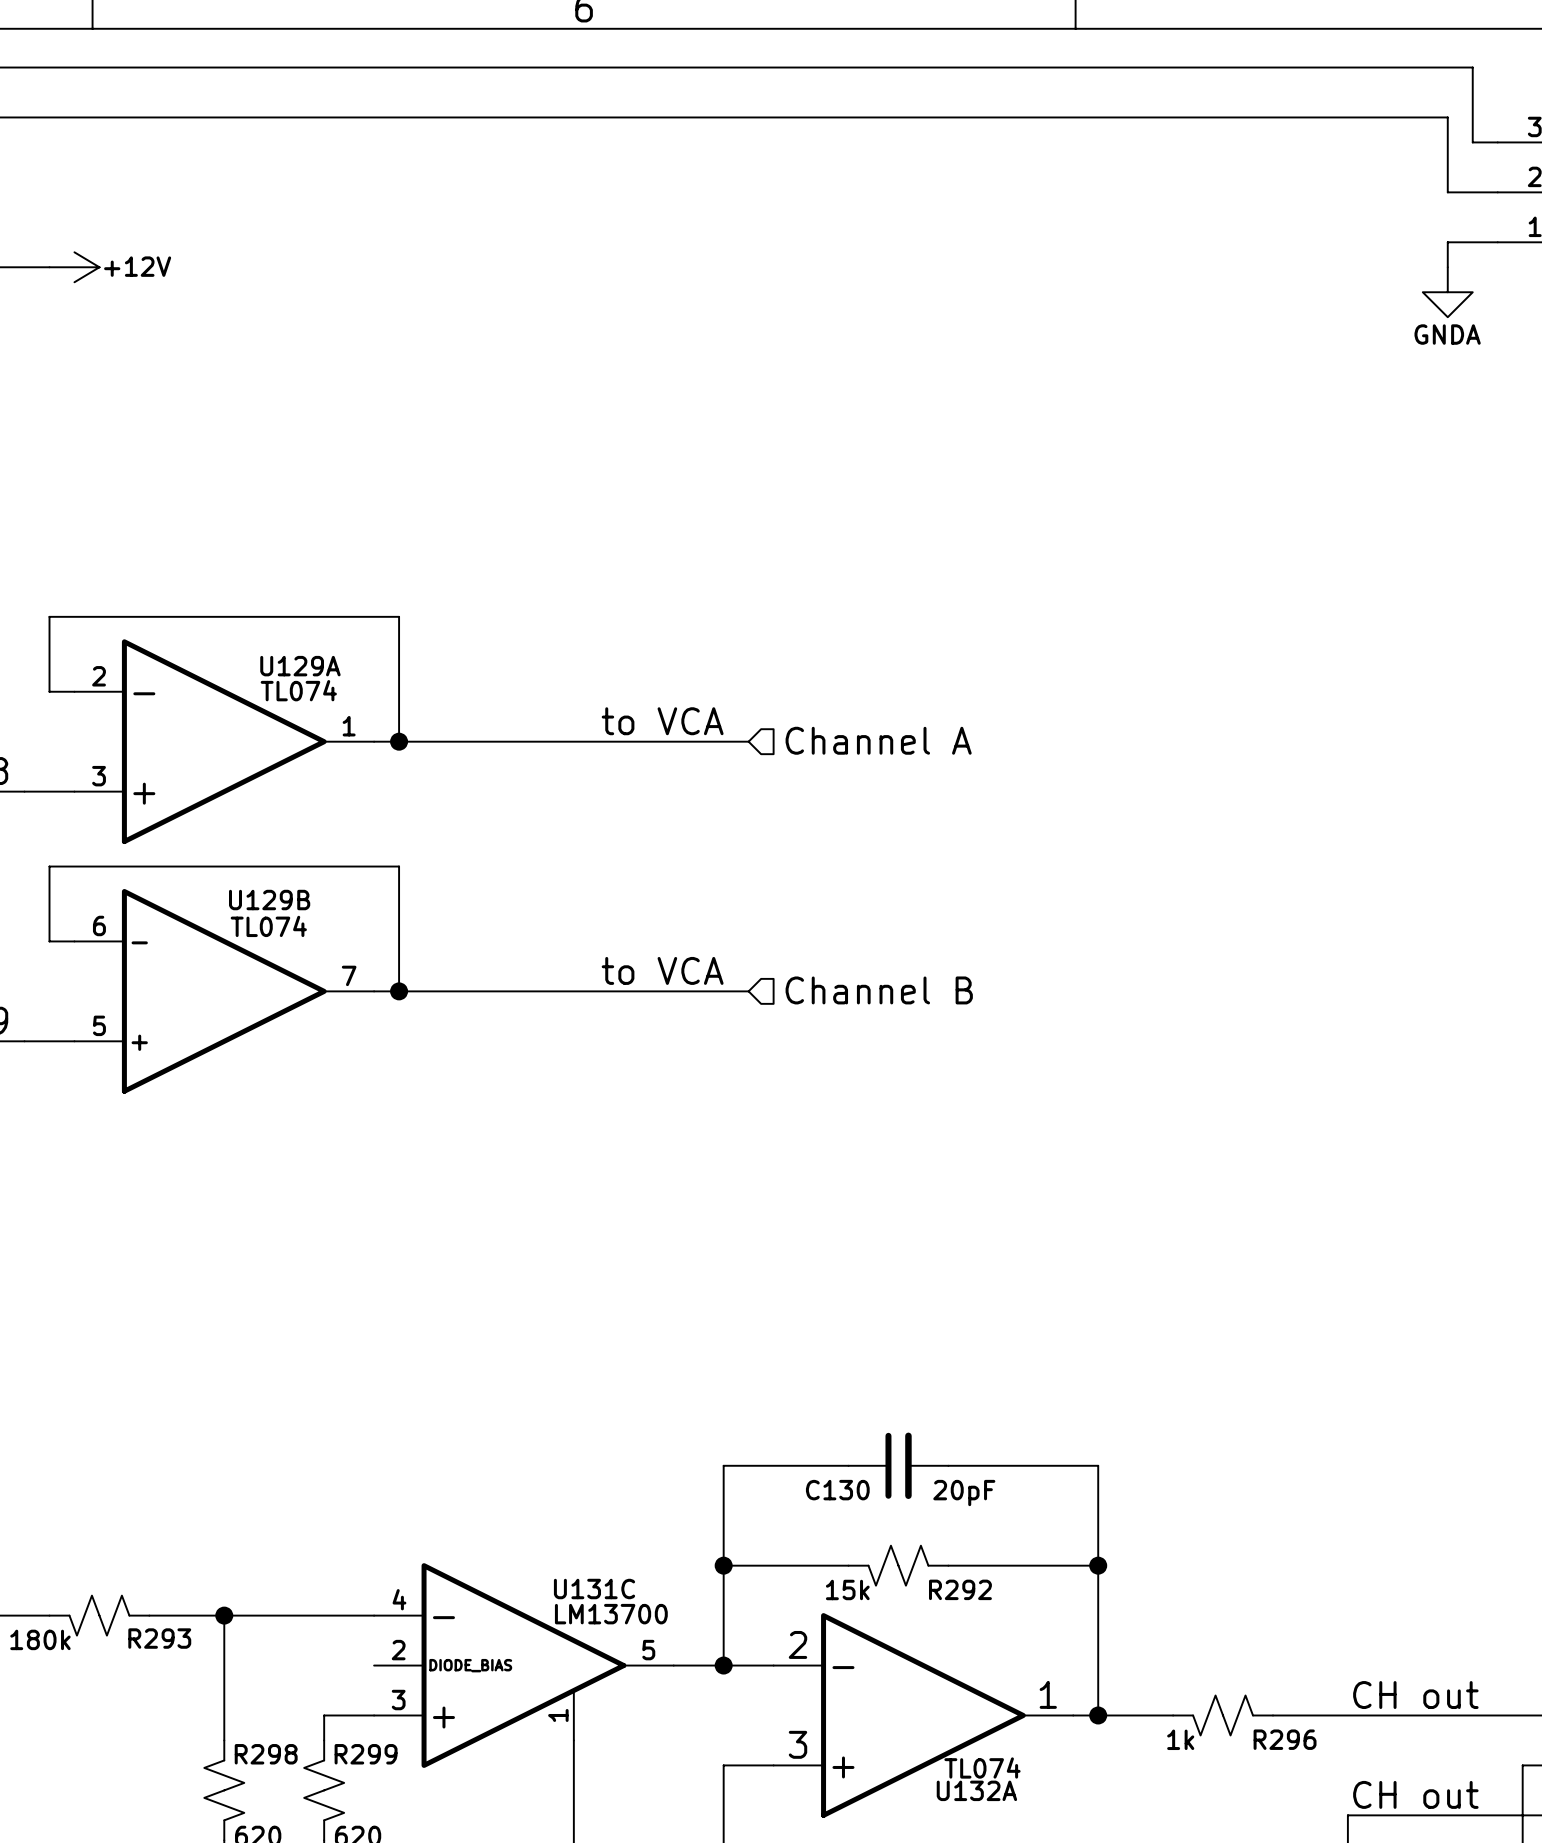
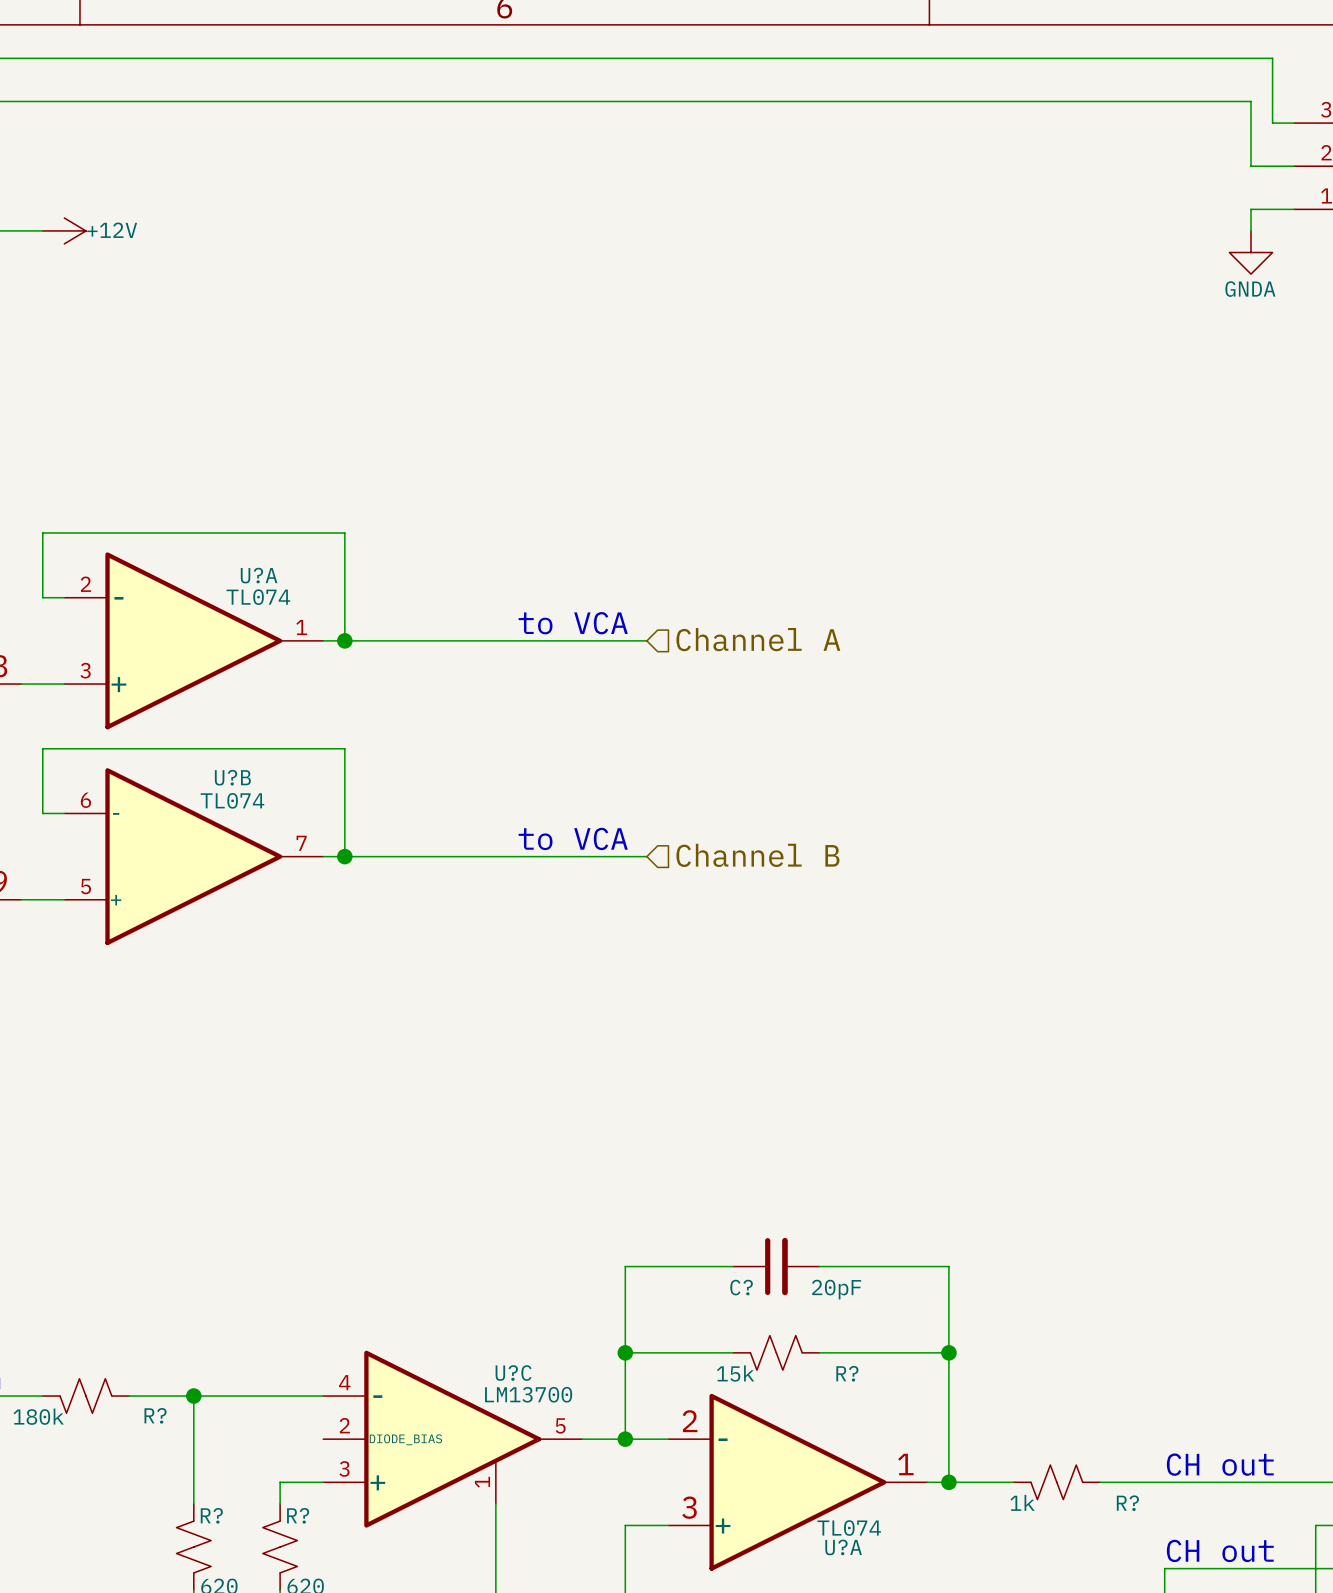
U129A name: U129A (300, 666) -> U?A (259, 575)
U129B name: U129B (269, 900) -> U?B (232, 777)
C130 name: C130 (837, 1490) -> C? (741, 1287)
U131C name: U131C (594, 1589) -> U?C (513, 1373)
R292 name: R292 (960, 1589) -> R? (847, 1373)
R293 name: R293 (159, 1638) -> R? (155, 1415)
R296 name: R296 (1285, 1739) -> R? (1127, 1503)
R298 name: R298 (266, 1754) -> R? (211, 1515)
R299 name: R299 (366, 1754) -> R? (298, 1515)
U132A name: U132A (976, 1790) -> U?A (843, 1547)

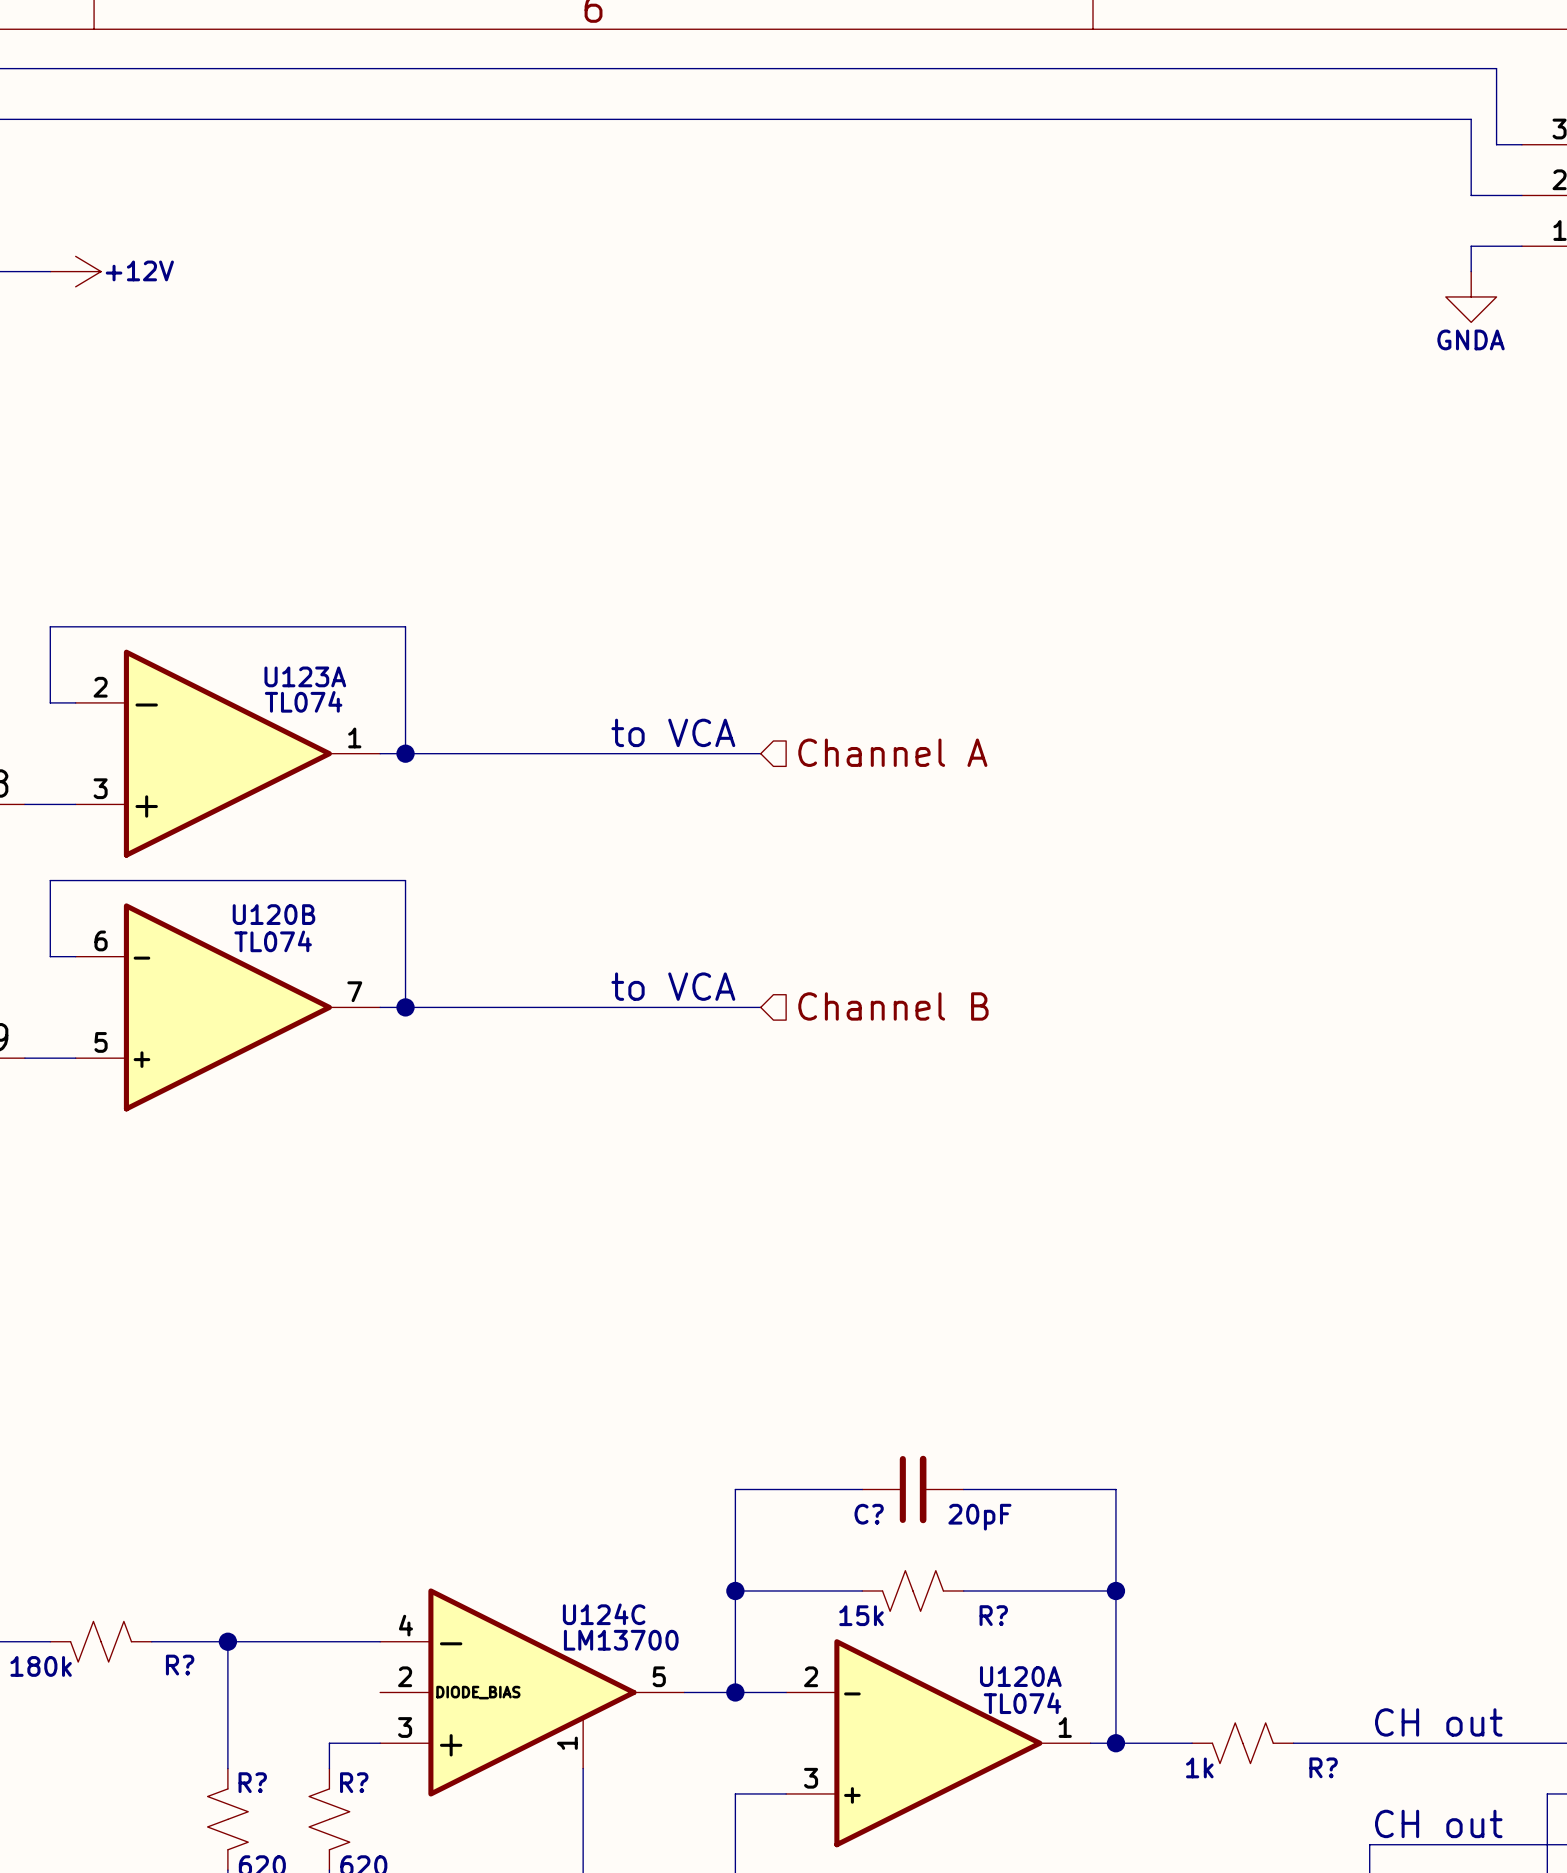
U?A name: U?A (259, 575) -> U123A (305, 676)
U?B name: U?B (232, 777) -> U120B (273, 914)
U?C name: U?C (513, 1373) -> U124C (604, 1614)
U?A symbol: [668, 1393, 928, 1571] -> [786, 1639, 1091, 1848]
U?A value position: TL074 (849, 1528) -> TL074 (1022, 1703)
U?A name: U?A (843, 1547) -> U120A (1020, 1676)

